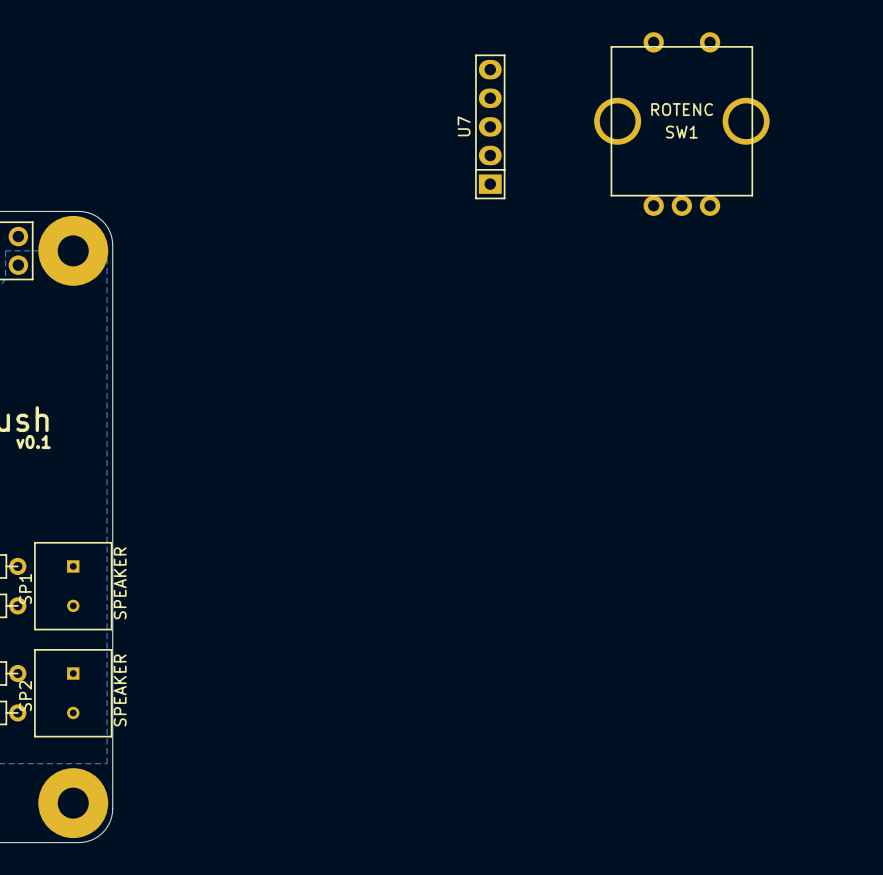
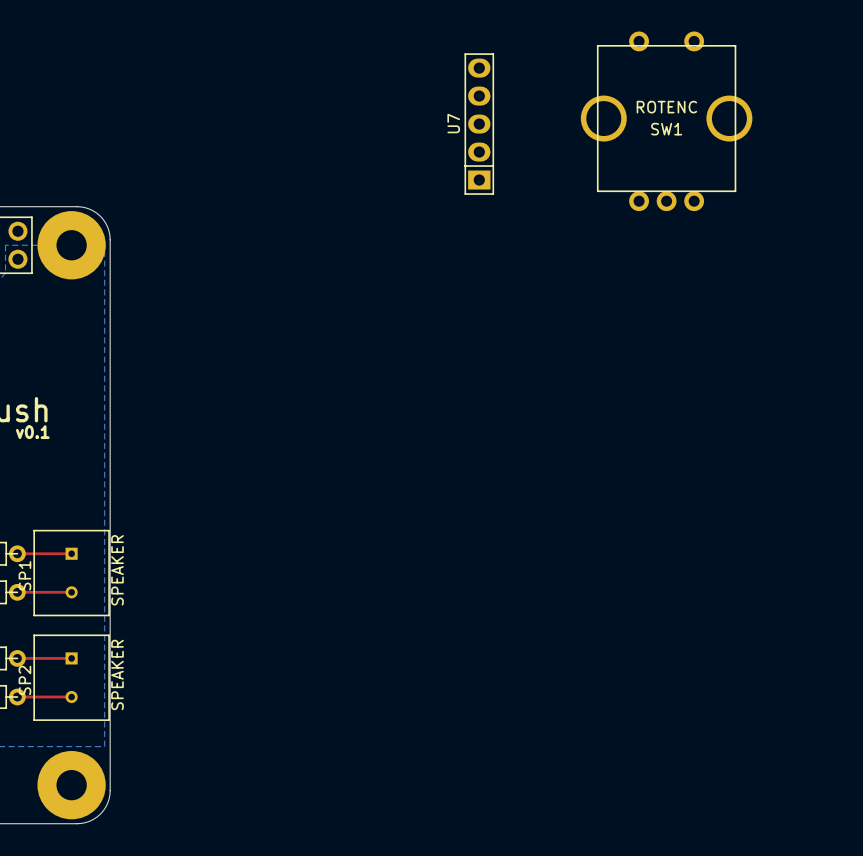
top track: none -> (17, 553) (71, 553)
top track: none -> (17, 592) (71, 592)
top track: none -> (17, 658) (71, 658)
top track: none -> (17, 697) (71, 697)

